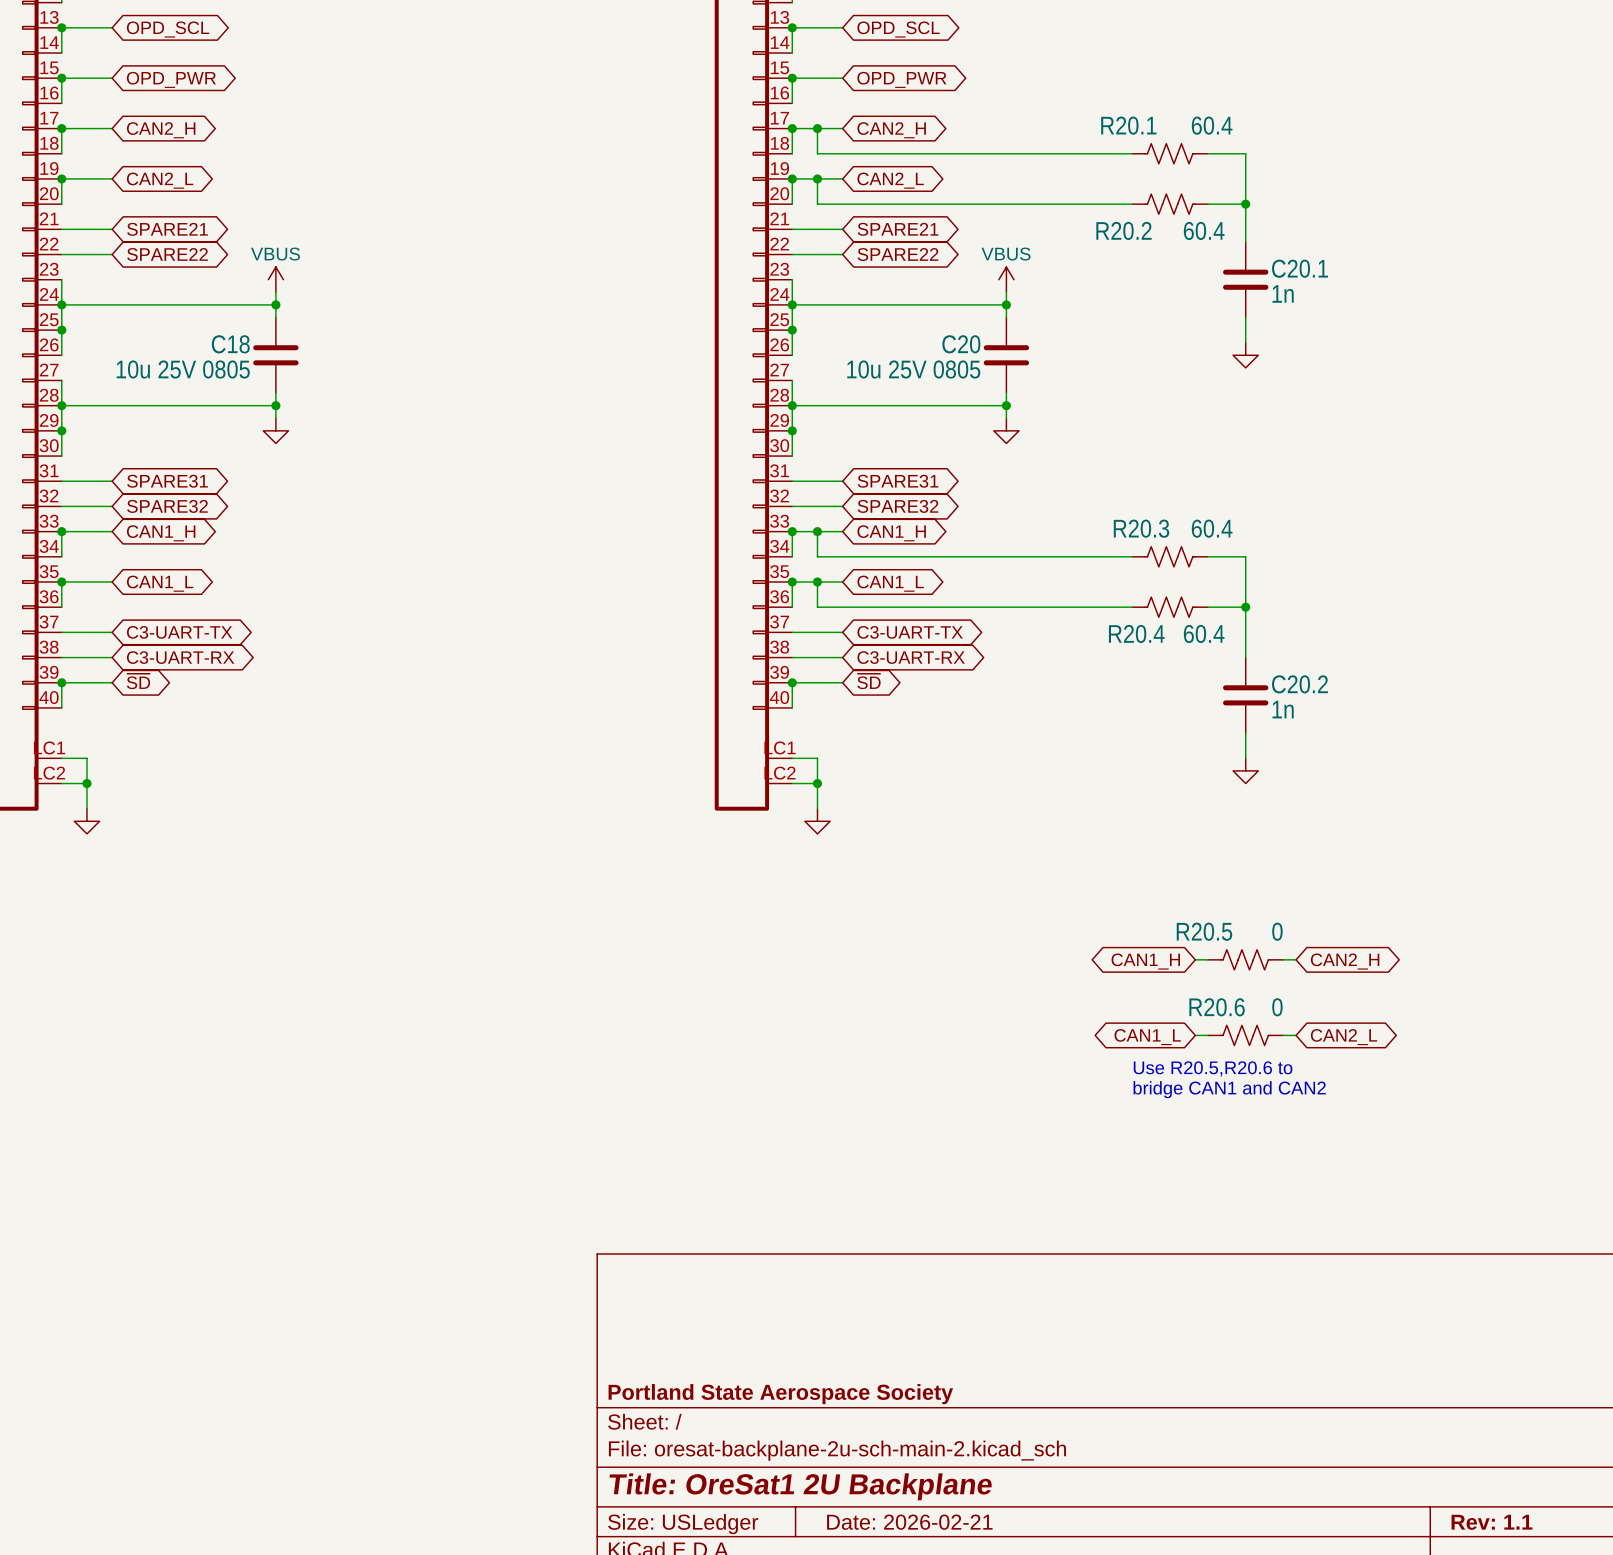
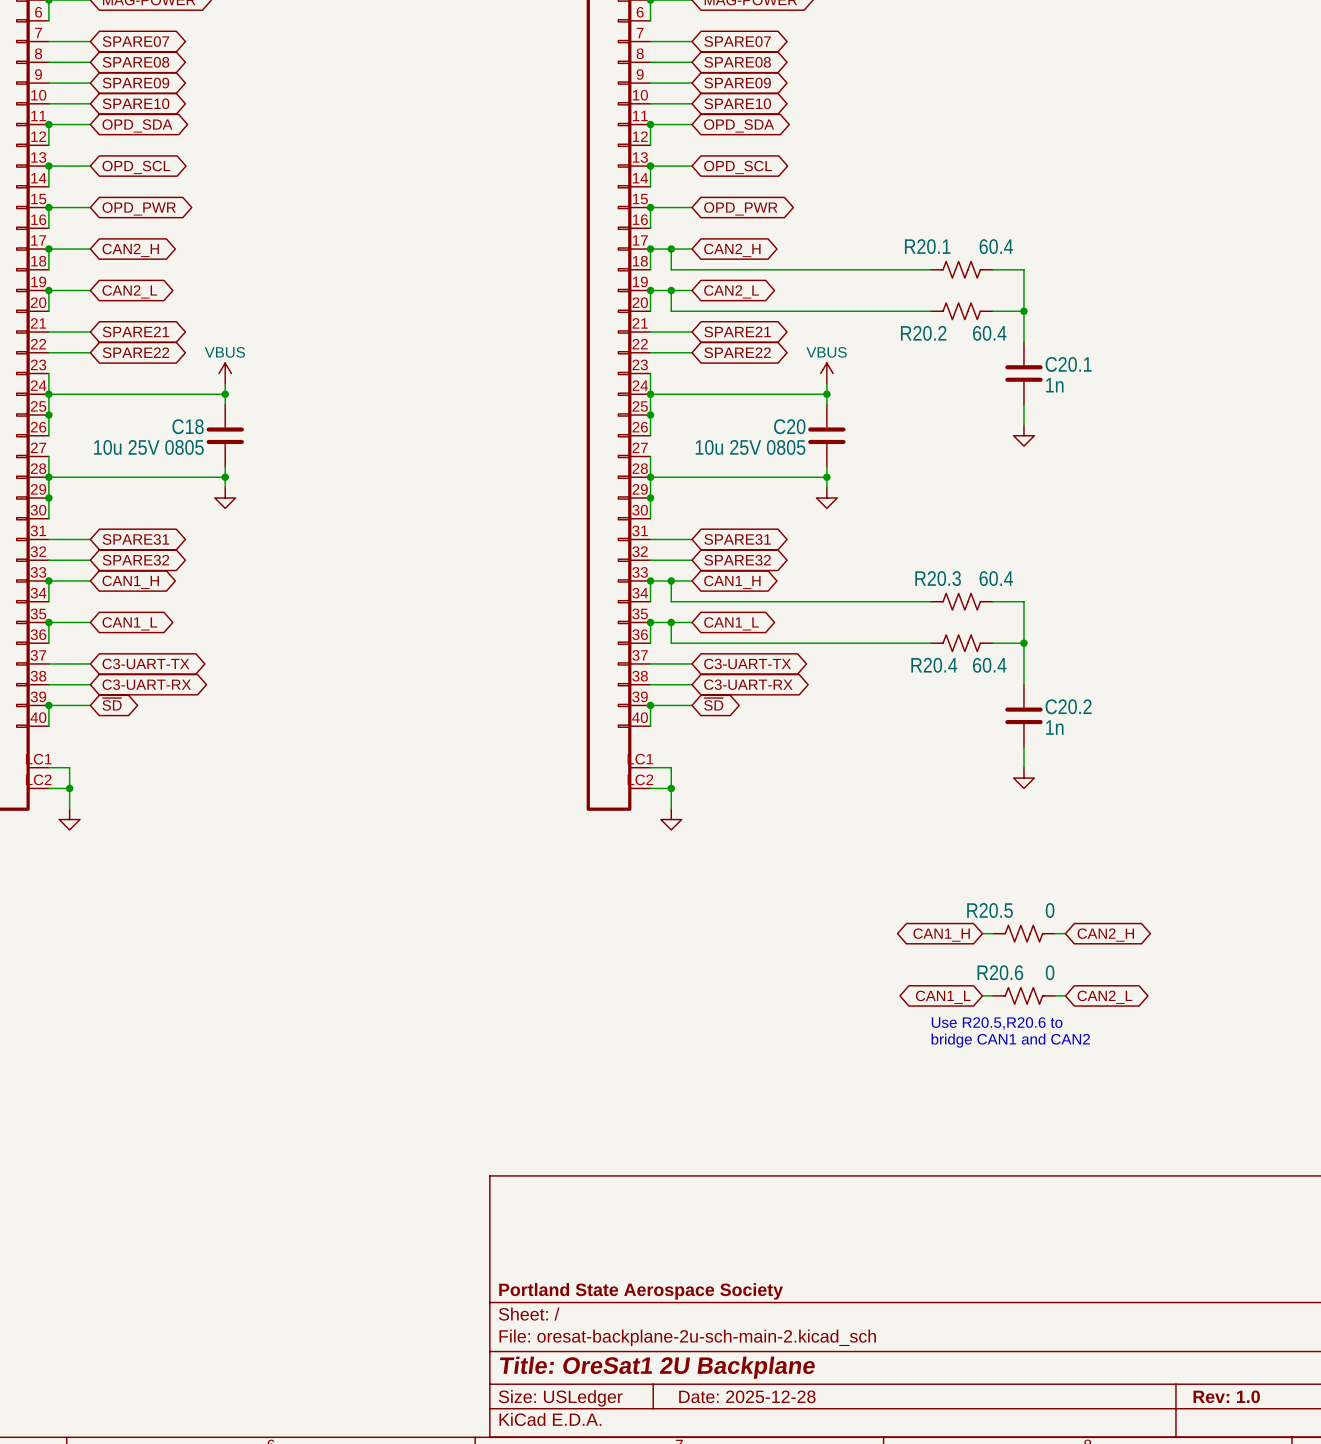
title block: Date: 2026-02-21 (909, 1522) -> Date: 2025-12-28 (747, 1396)
title block: Rev: 1.1 (1491, 1522) -> Rev: 1.0 (1226, 1396)

